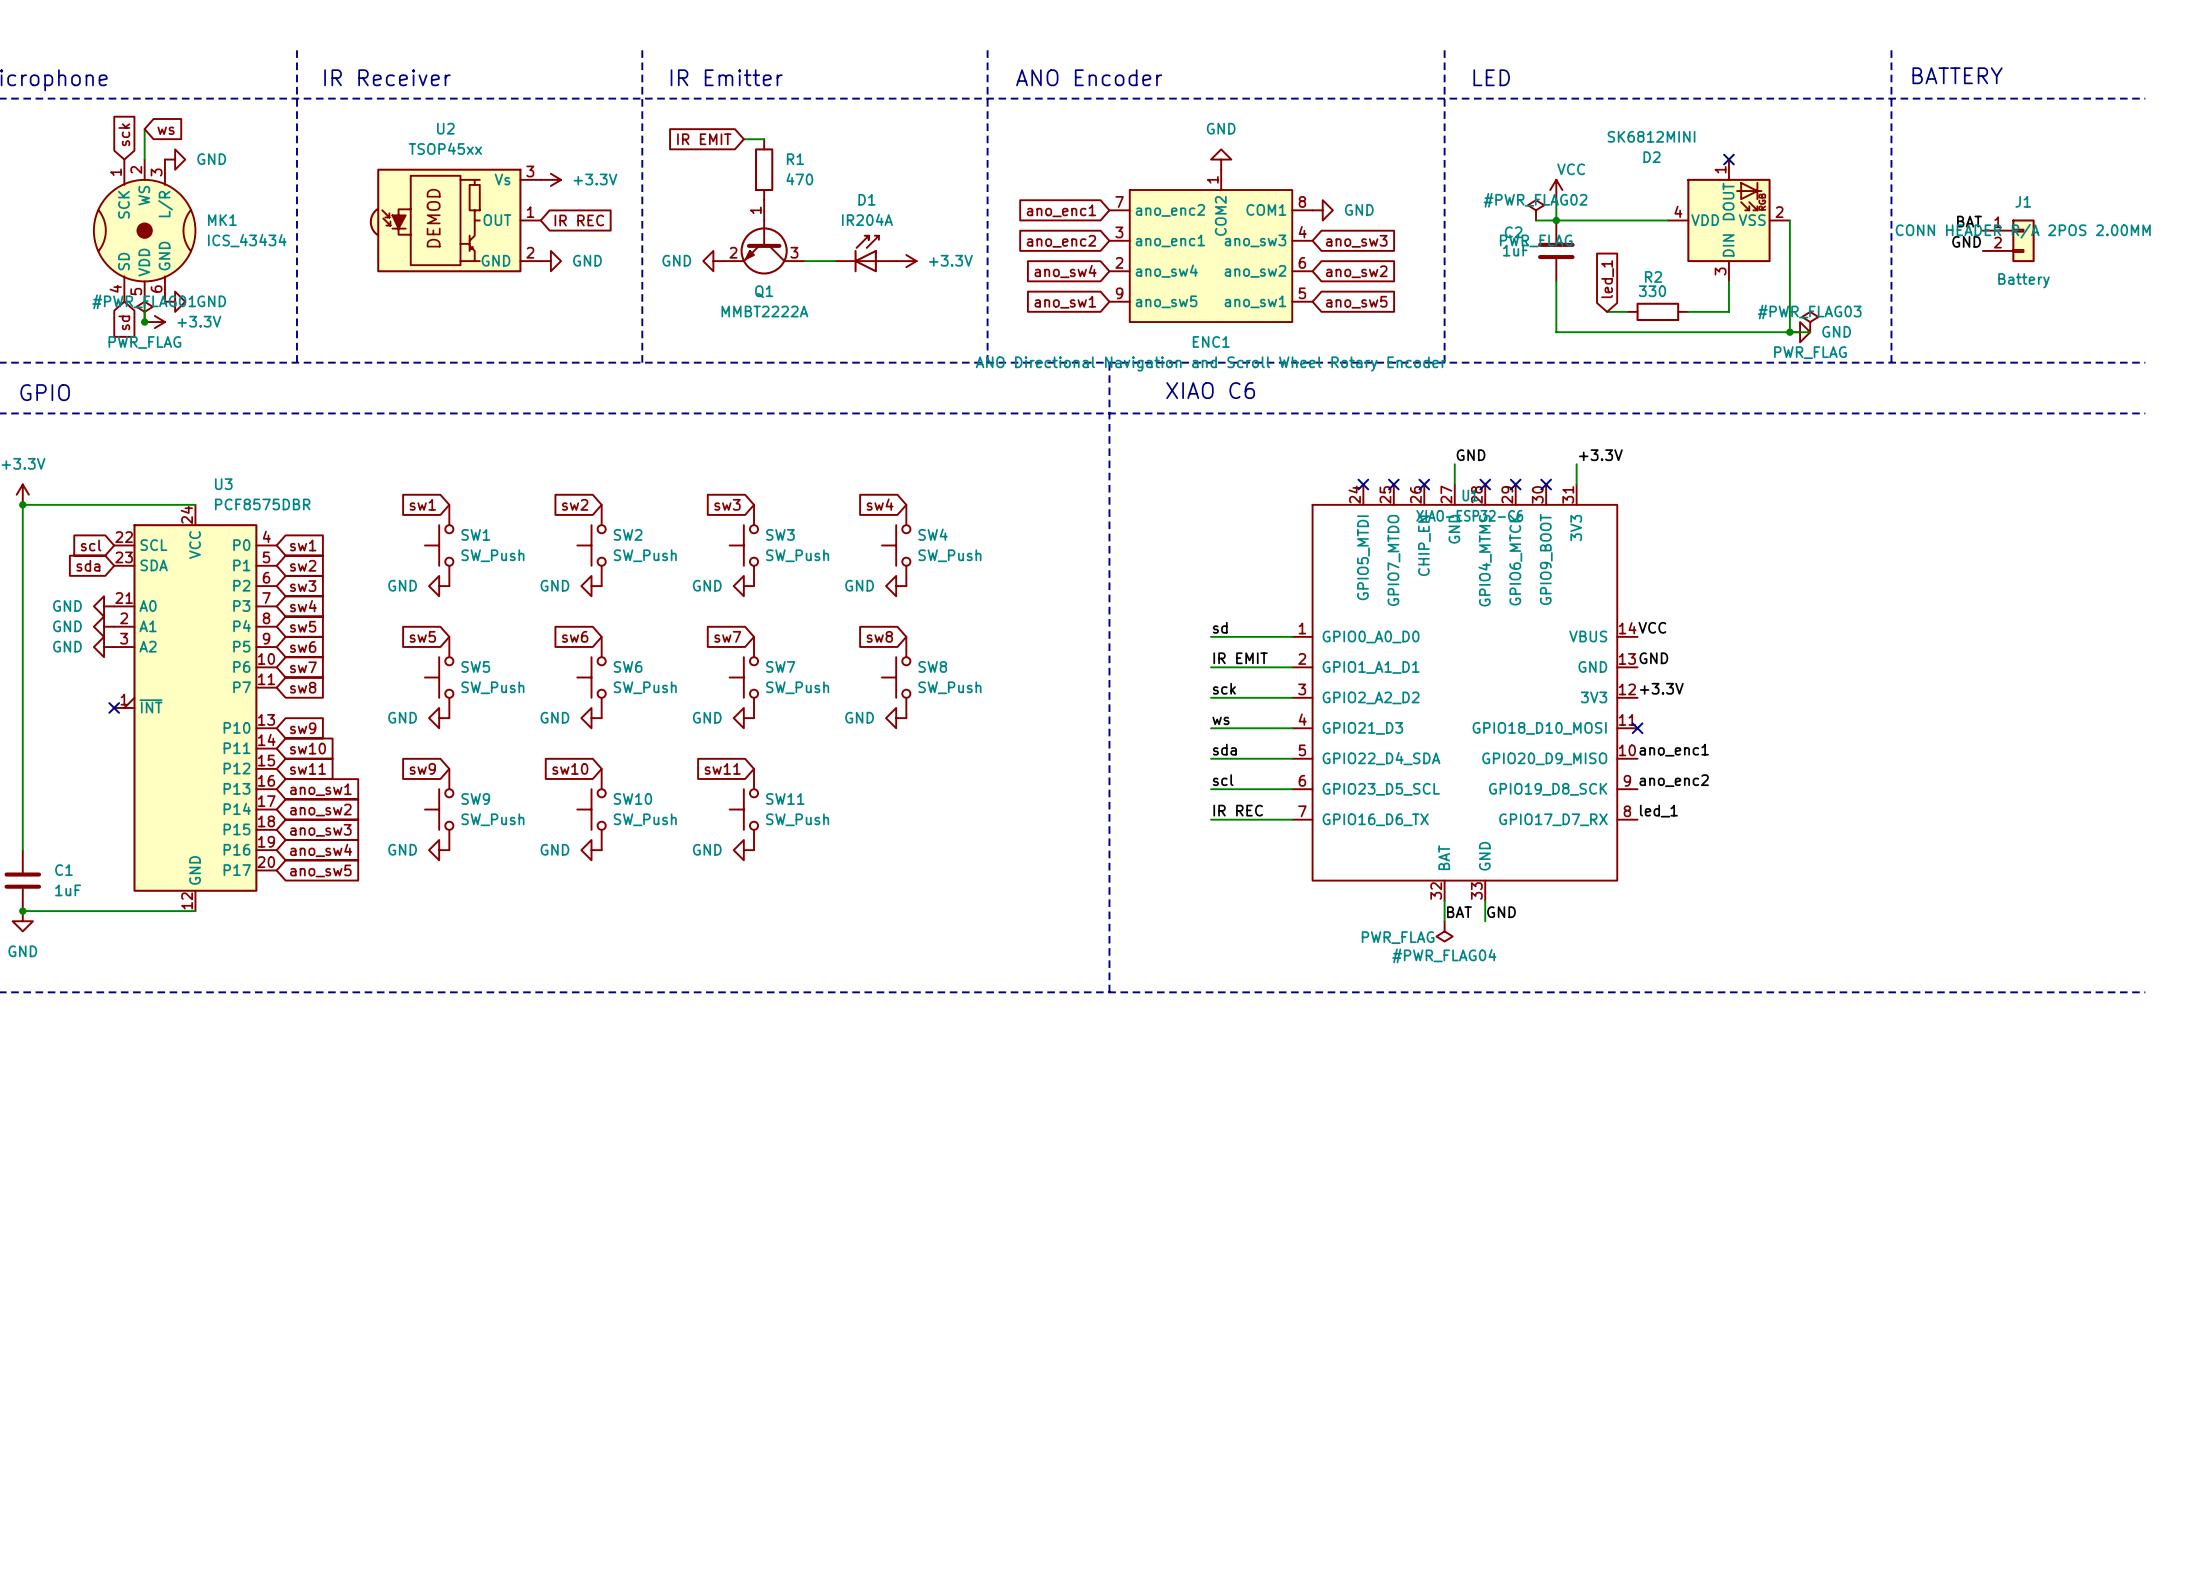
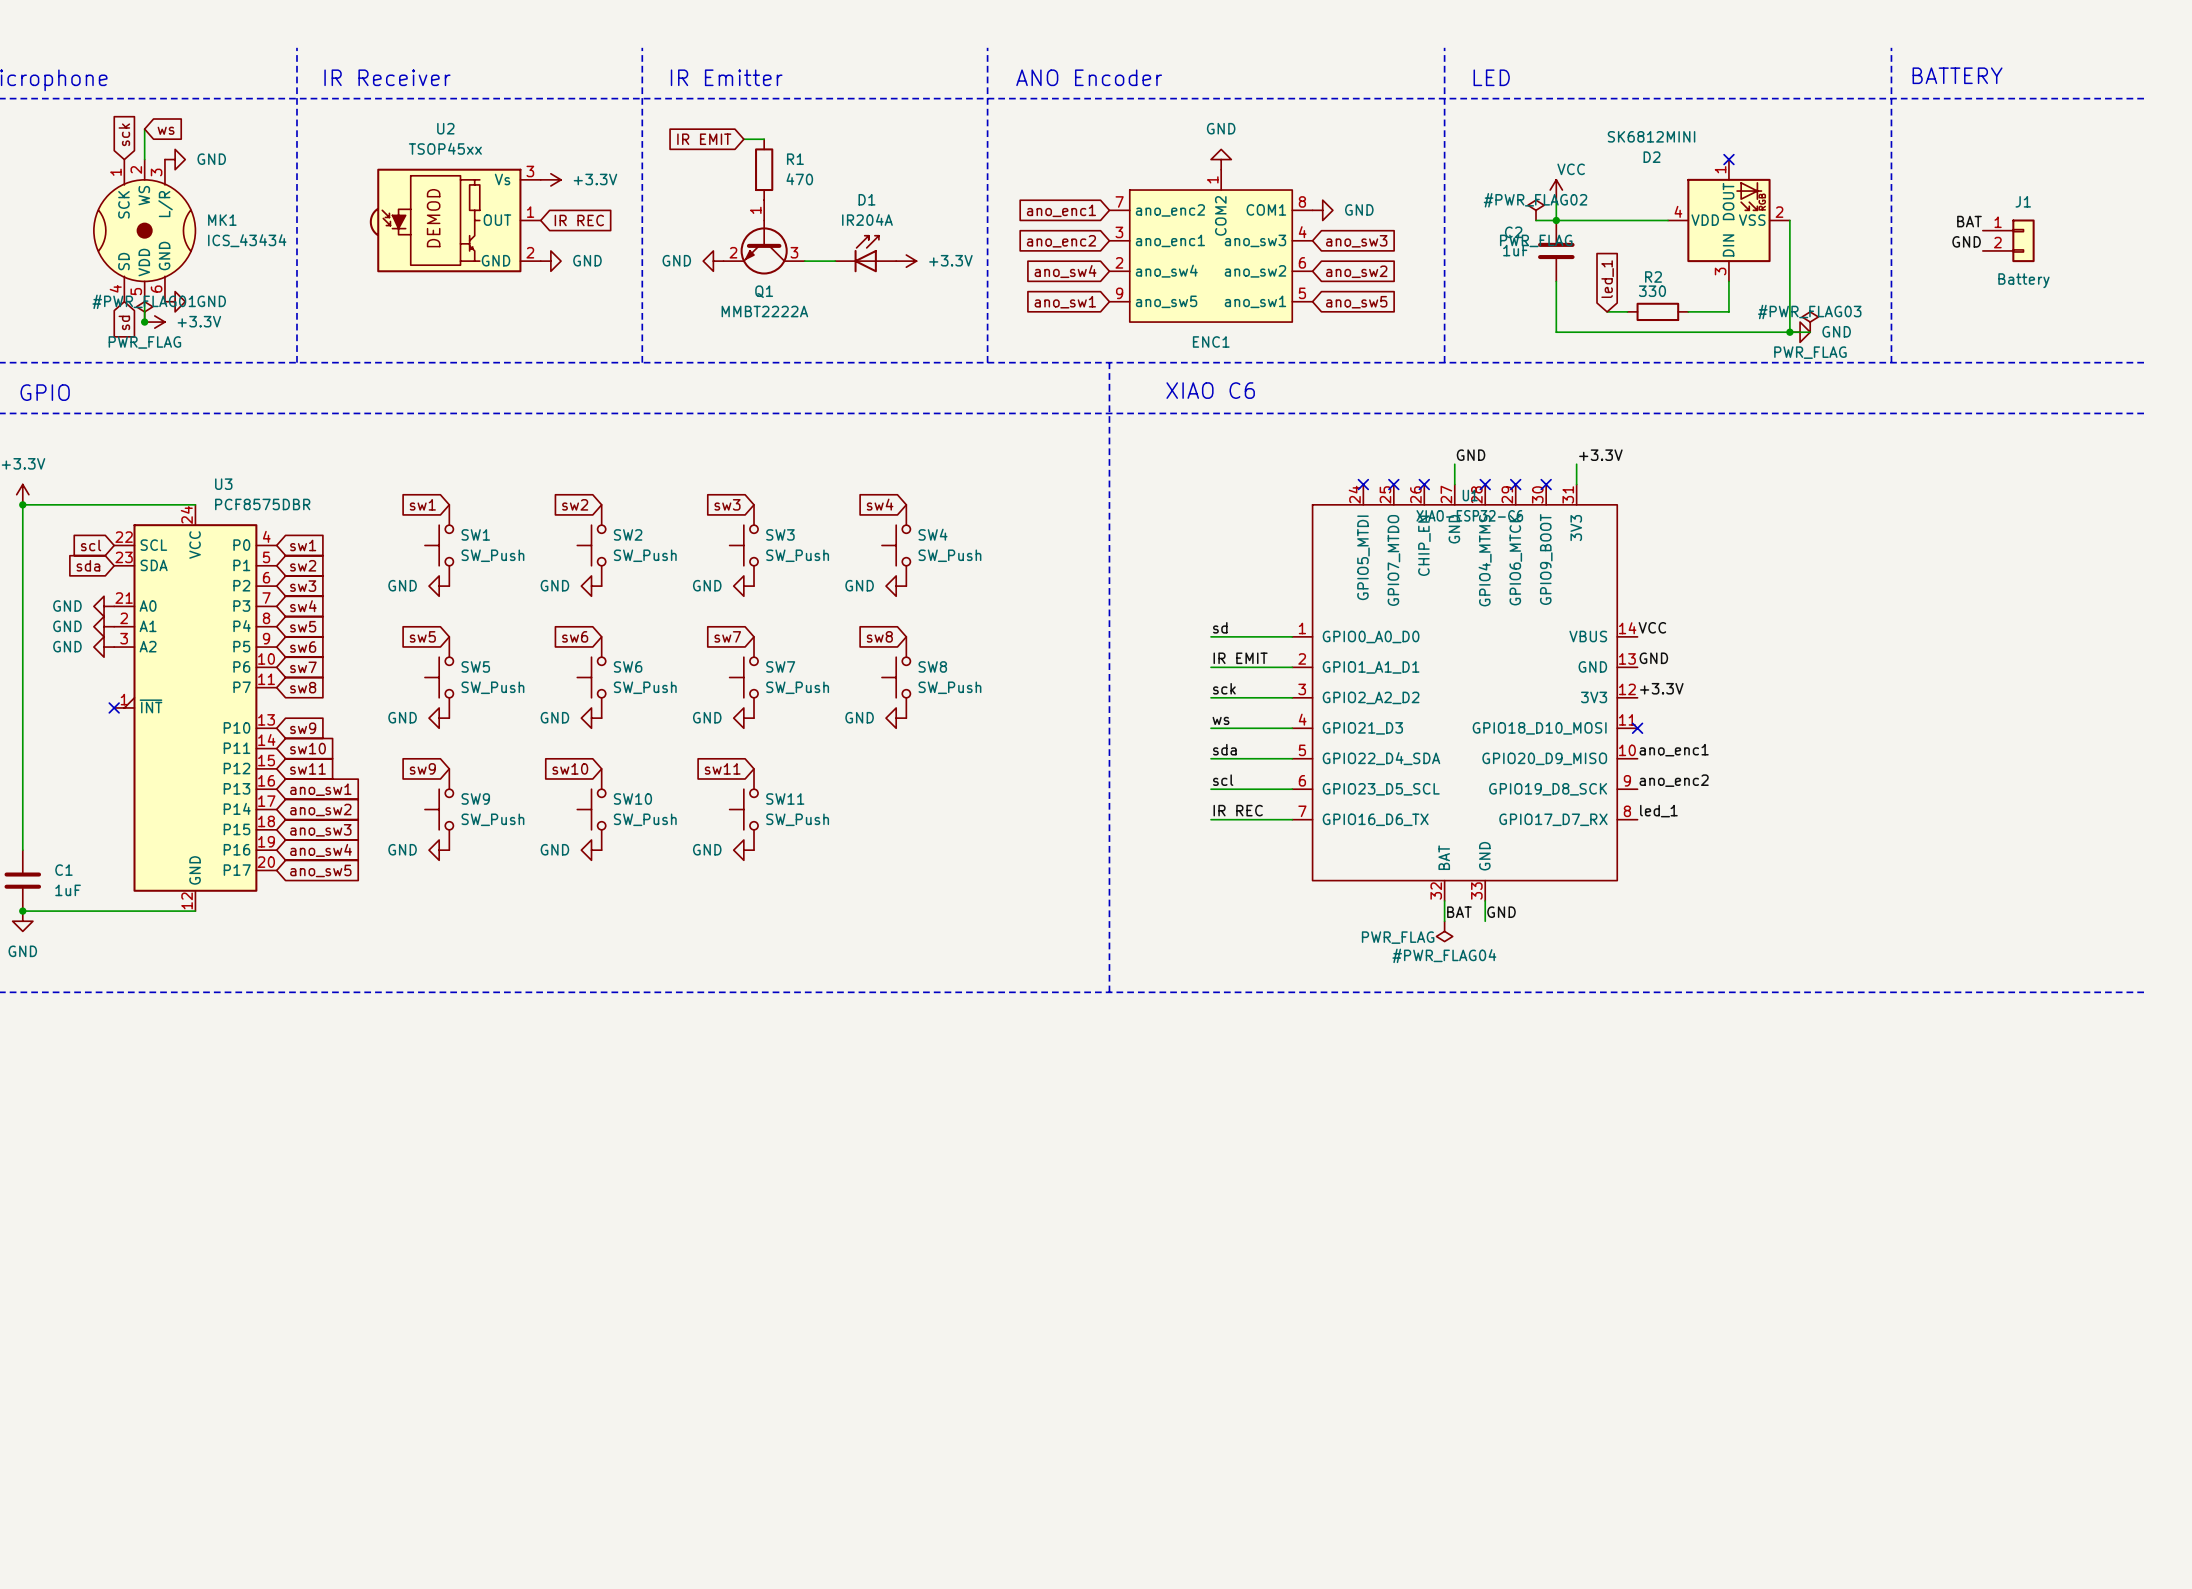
J1 text: CONN HEADER R/A 2POS 2.00MM (2023, 231) -> none
ENC1 value: ANO Directional Navigation and Scroll Wheel Rotary Encoder (1211, 363) -> none

